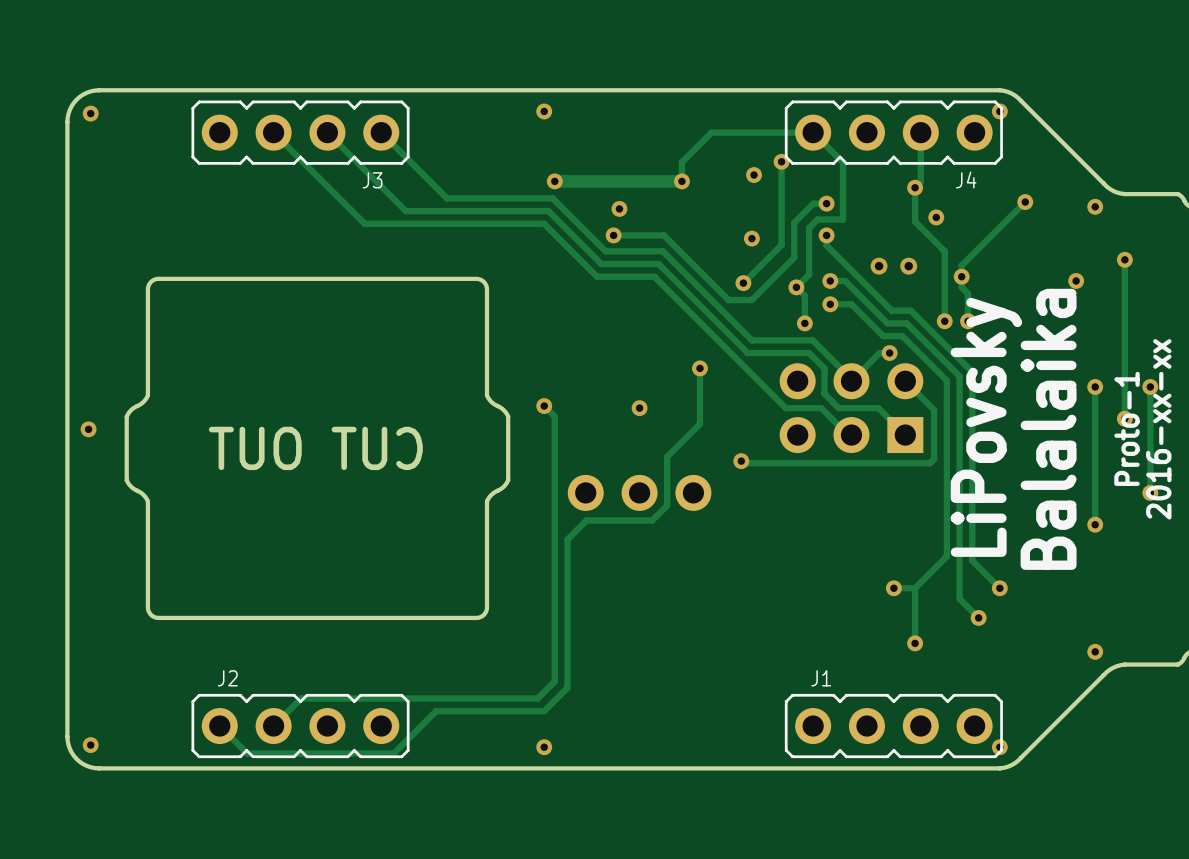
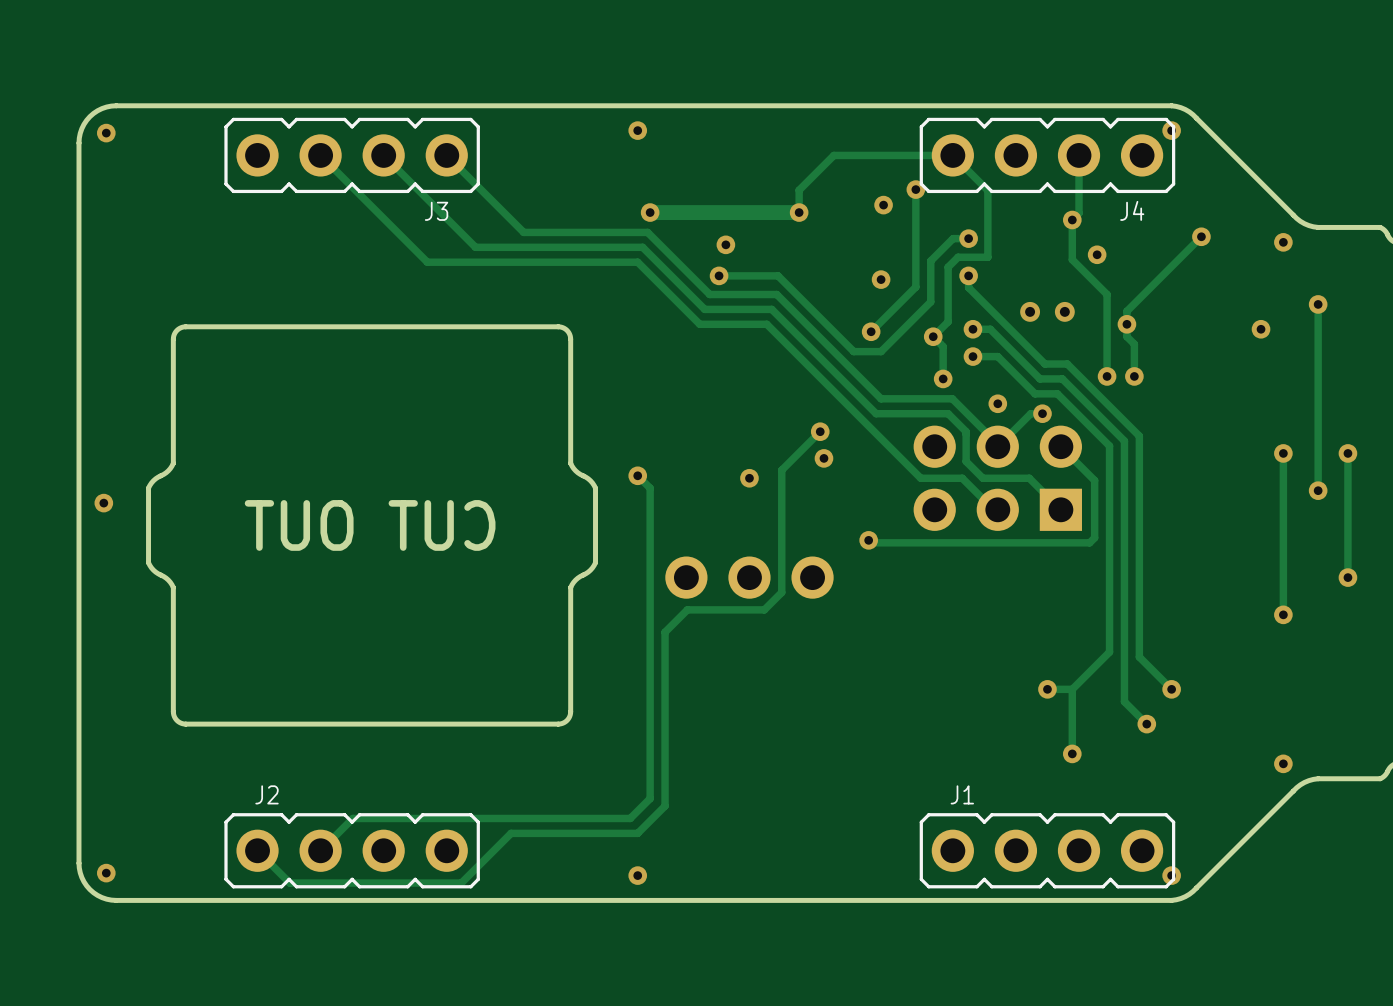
via: none -> (997, 403)
track: (699, 368) (699, 424) (667, 456) -> (820, 431) (781, 470) (781, 535)
via: none -> (823, 458)
text: LiPovsky (986, 427) -> none
text: Proto-1 (1127, 428) -> none
text: Balalaika (1048, 429) -> none
text: 2016-xx-xx (1158, 429) -> none

